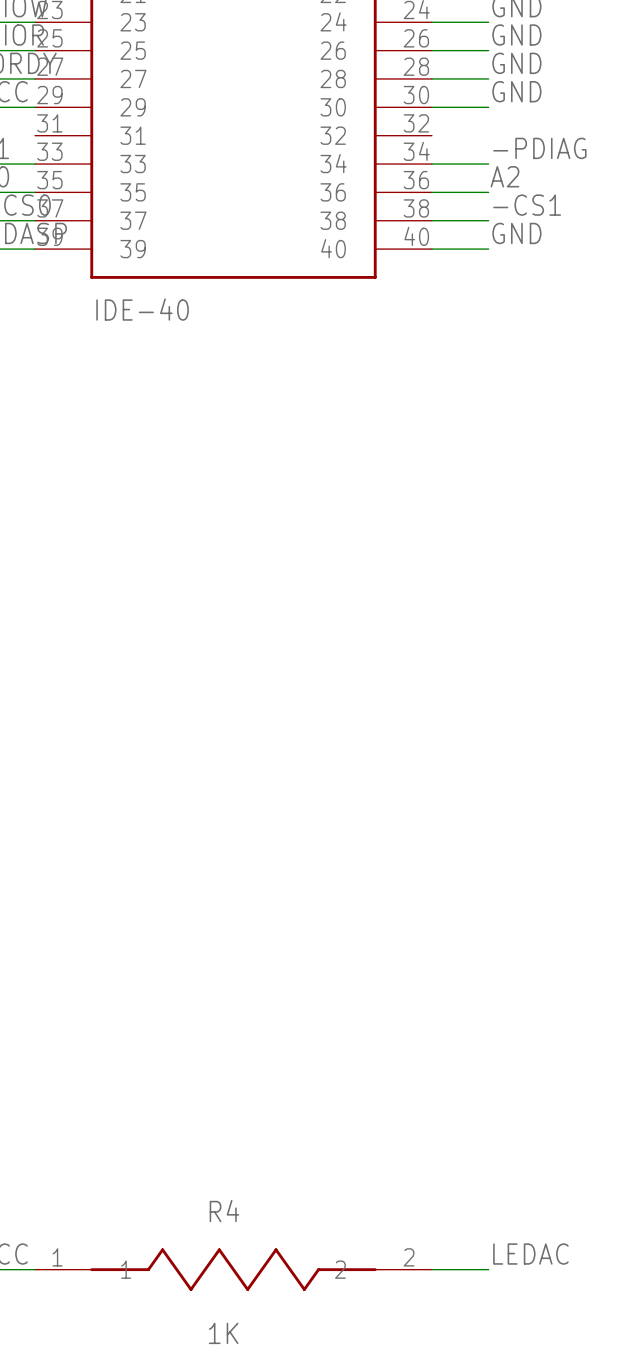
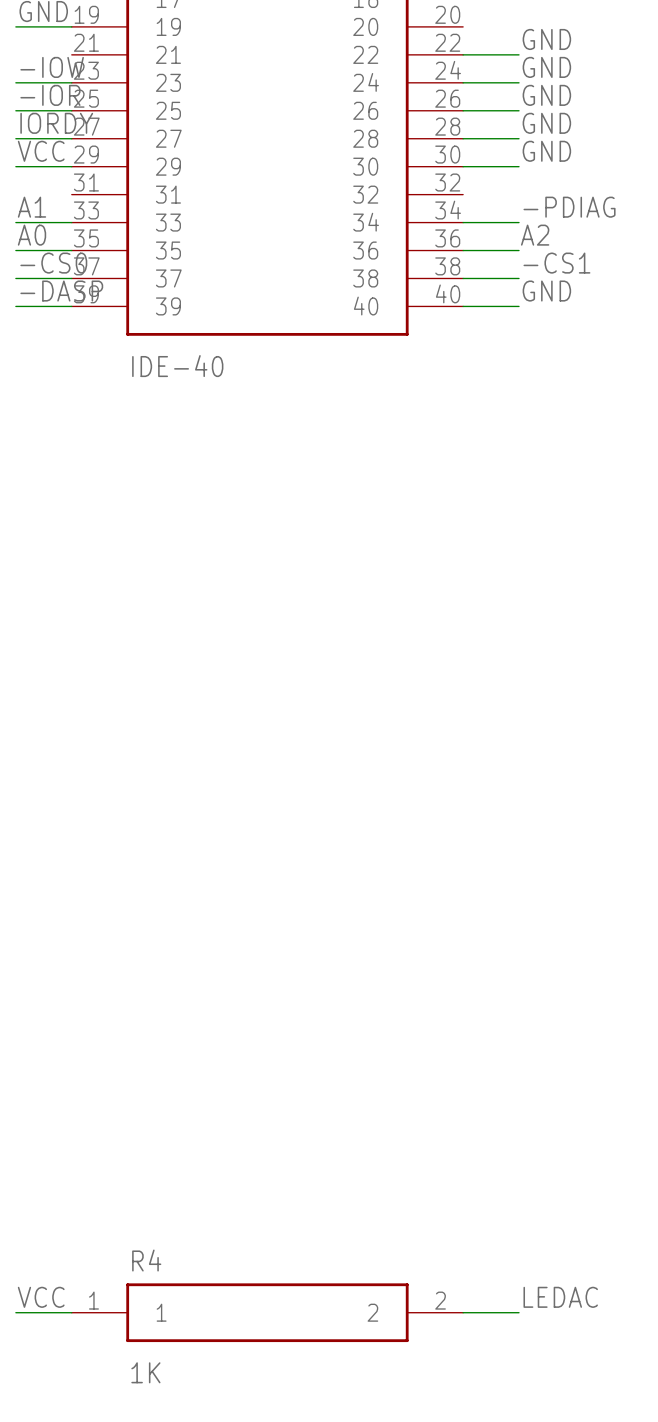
R4 name position: R4 (224, 1211) -> R4 (146, 1260)
R4 symbol: [35, 1248, 432, 1291] -> [71, 1283, 464, 1343]
R4 value position: 1K (223, 1333) -> 1K (145, 1372)

